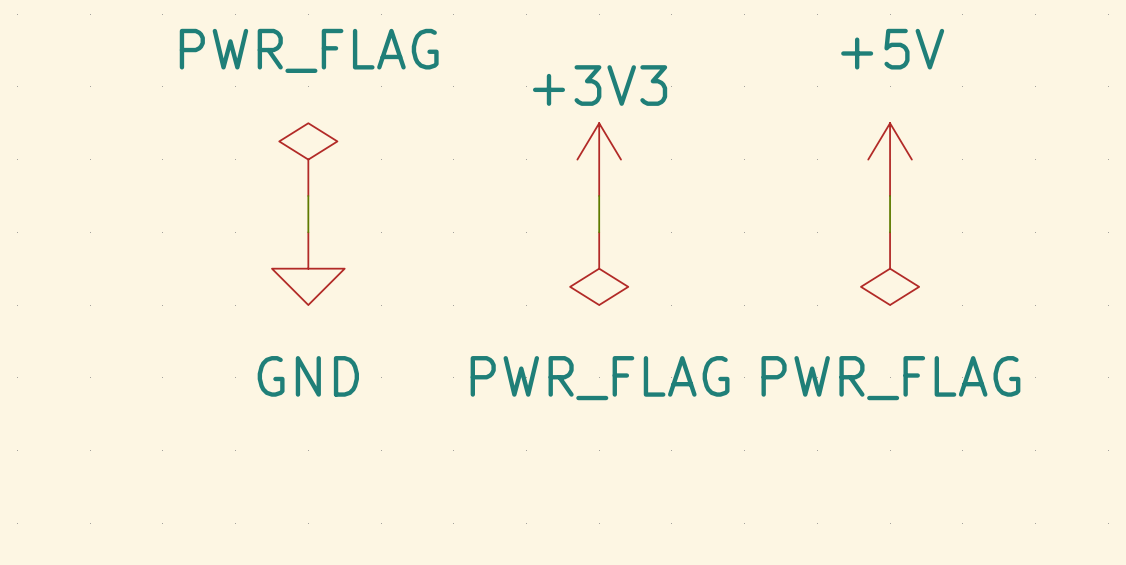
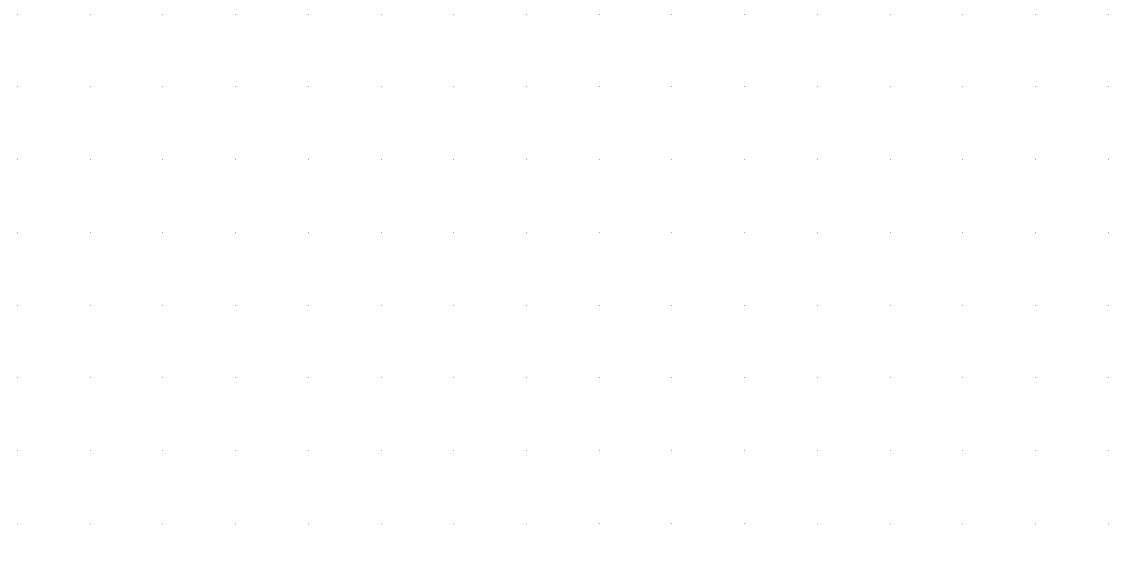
power symbol: PWR_FLAG (308, 159) -> none
power symbol: +3V3 (599, 159) -> none
power symbol: +5V (890, 159) -> none
wire: (308, 195) (308, 232) -> none
wire: (599, 195) (599, 232) -> none
wire: (890, 195) (890, 232) -> none
power symbol: GND (308, 268) -> none
power symbol: PWR_FLAG (599, 268) -> none
power symbol: PWR_FLAG (890, 268) -> none

